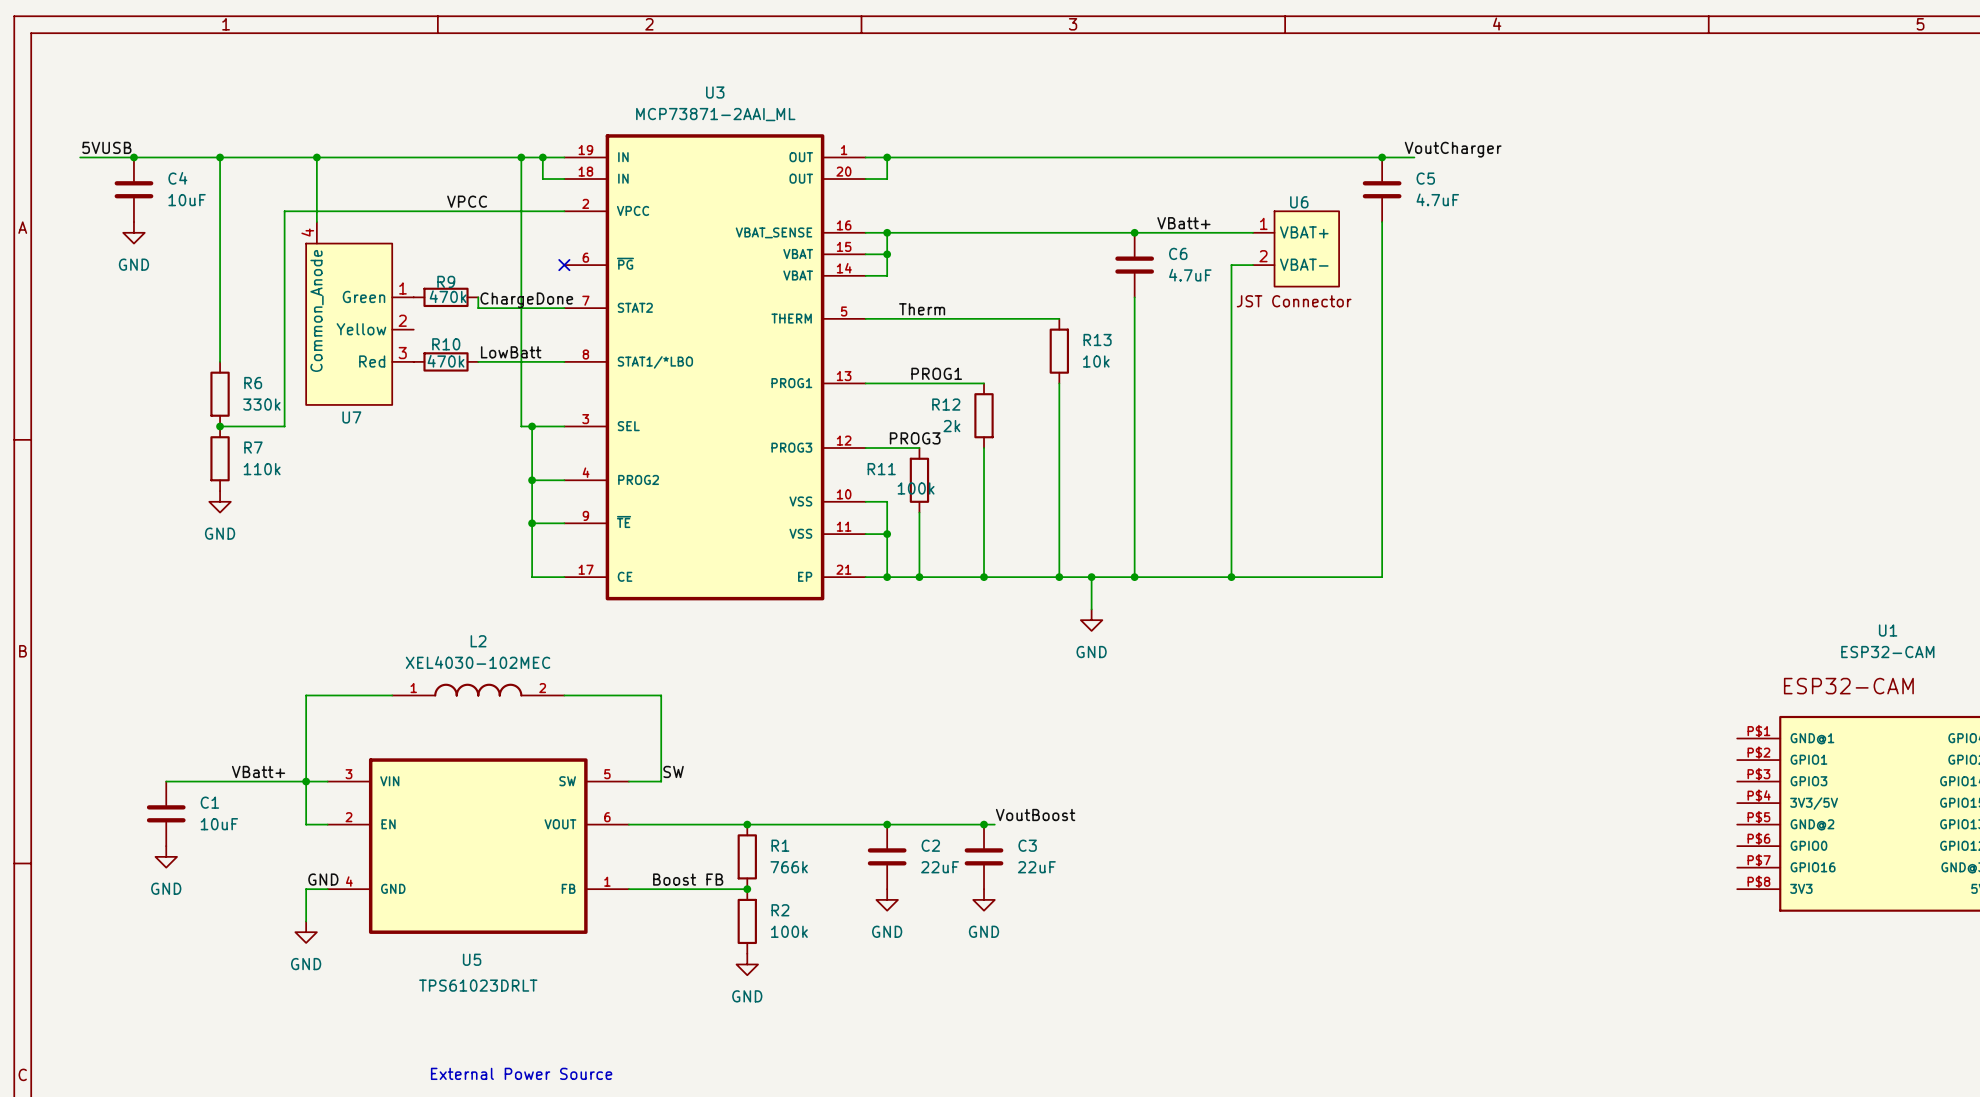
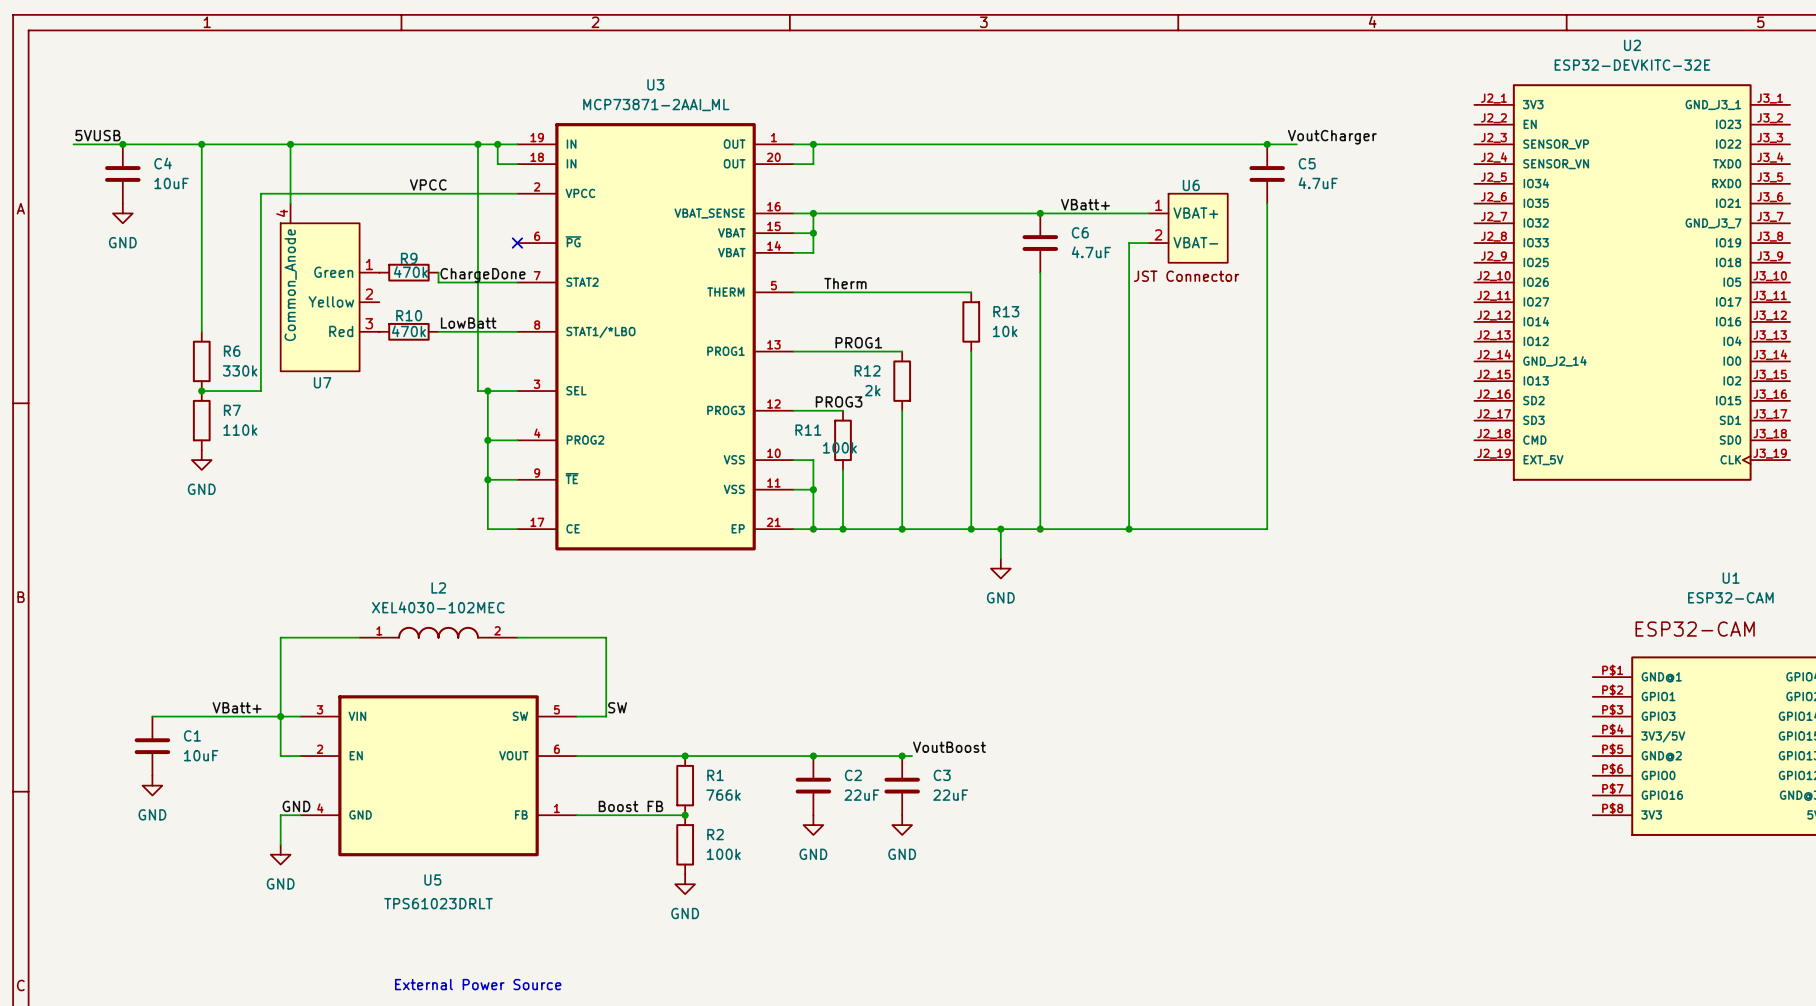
U2: none -> ESP32-DEVKITC-32E (1632, 282)

